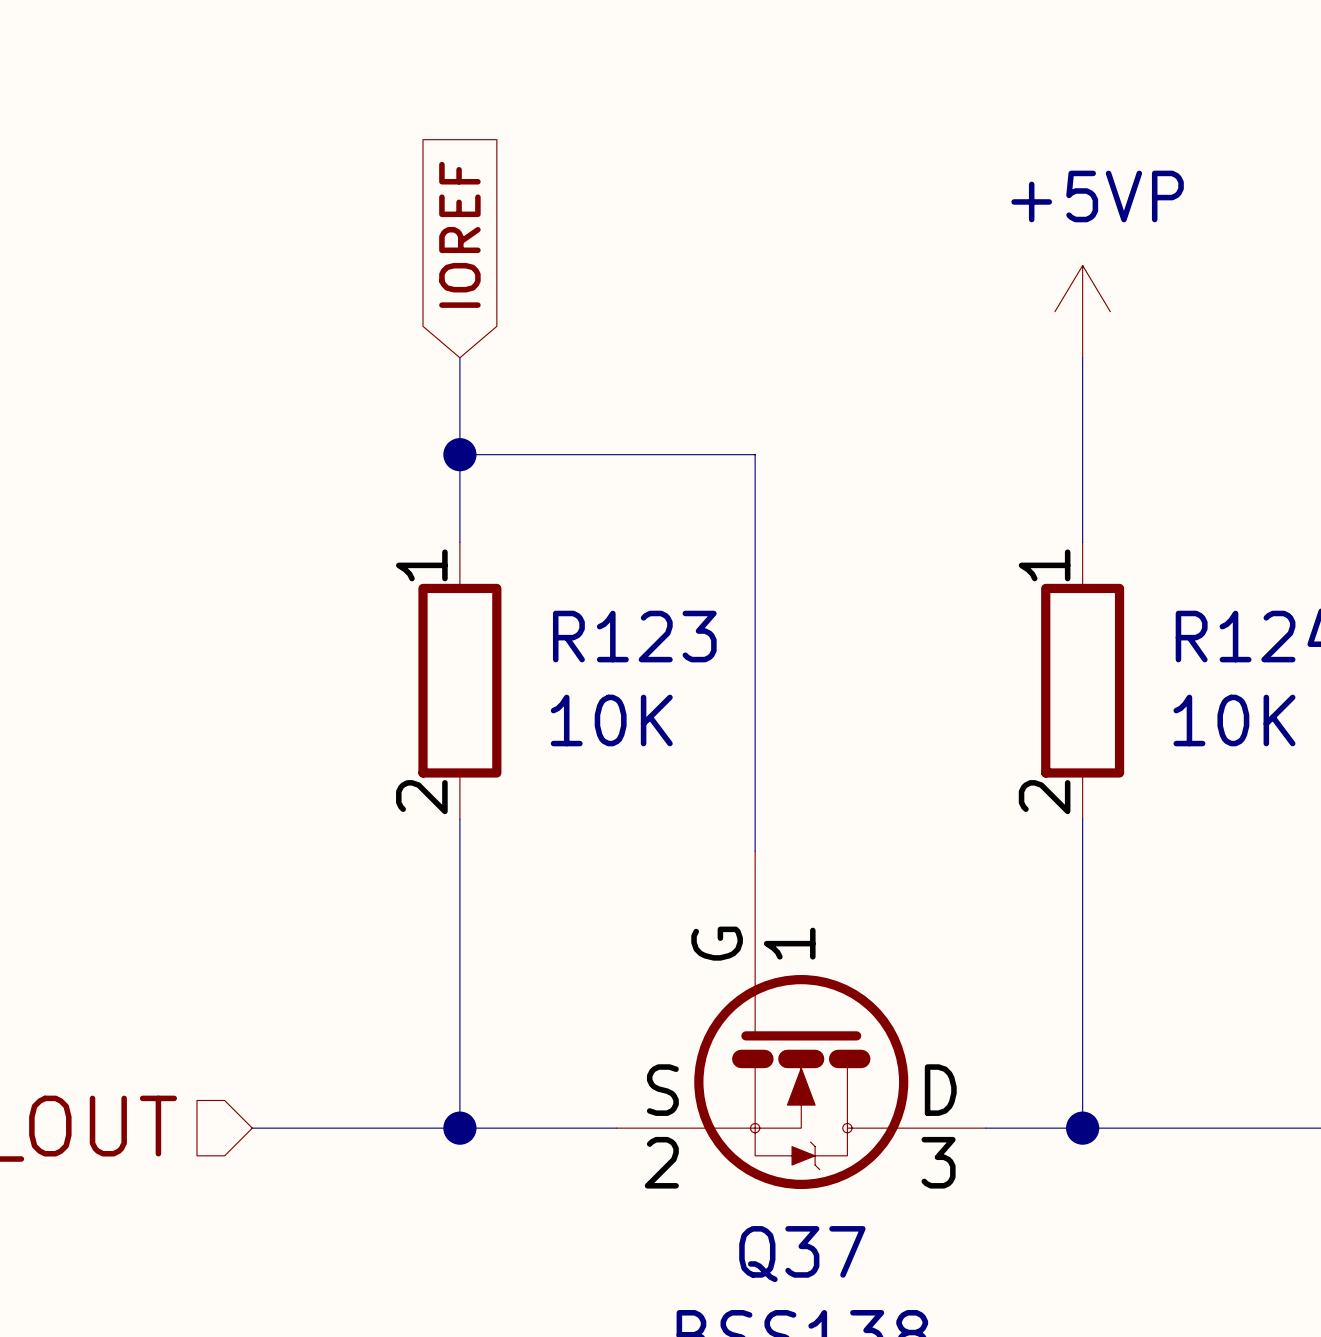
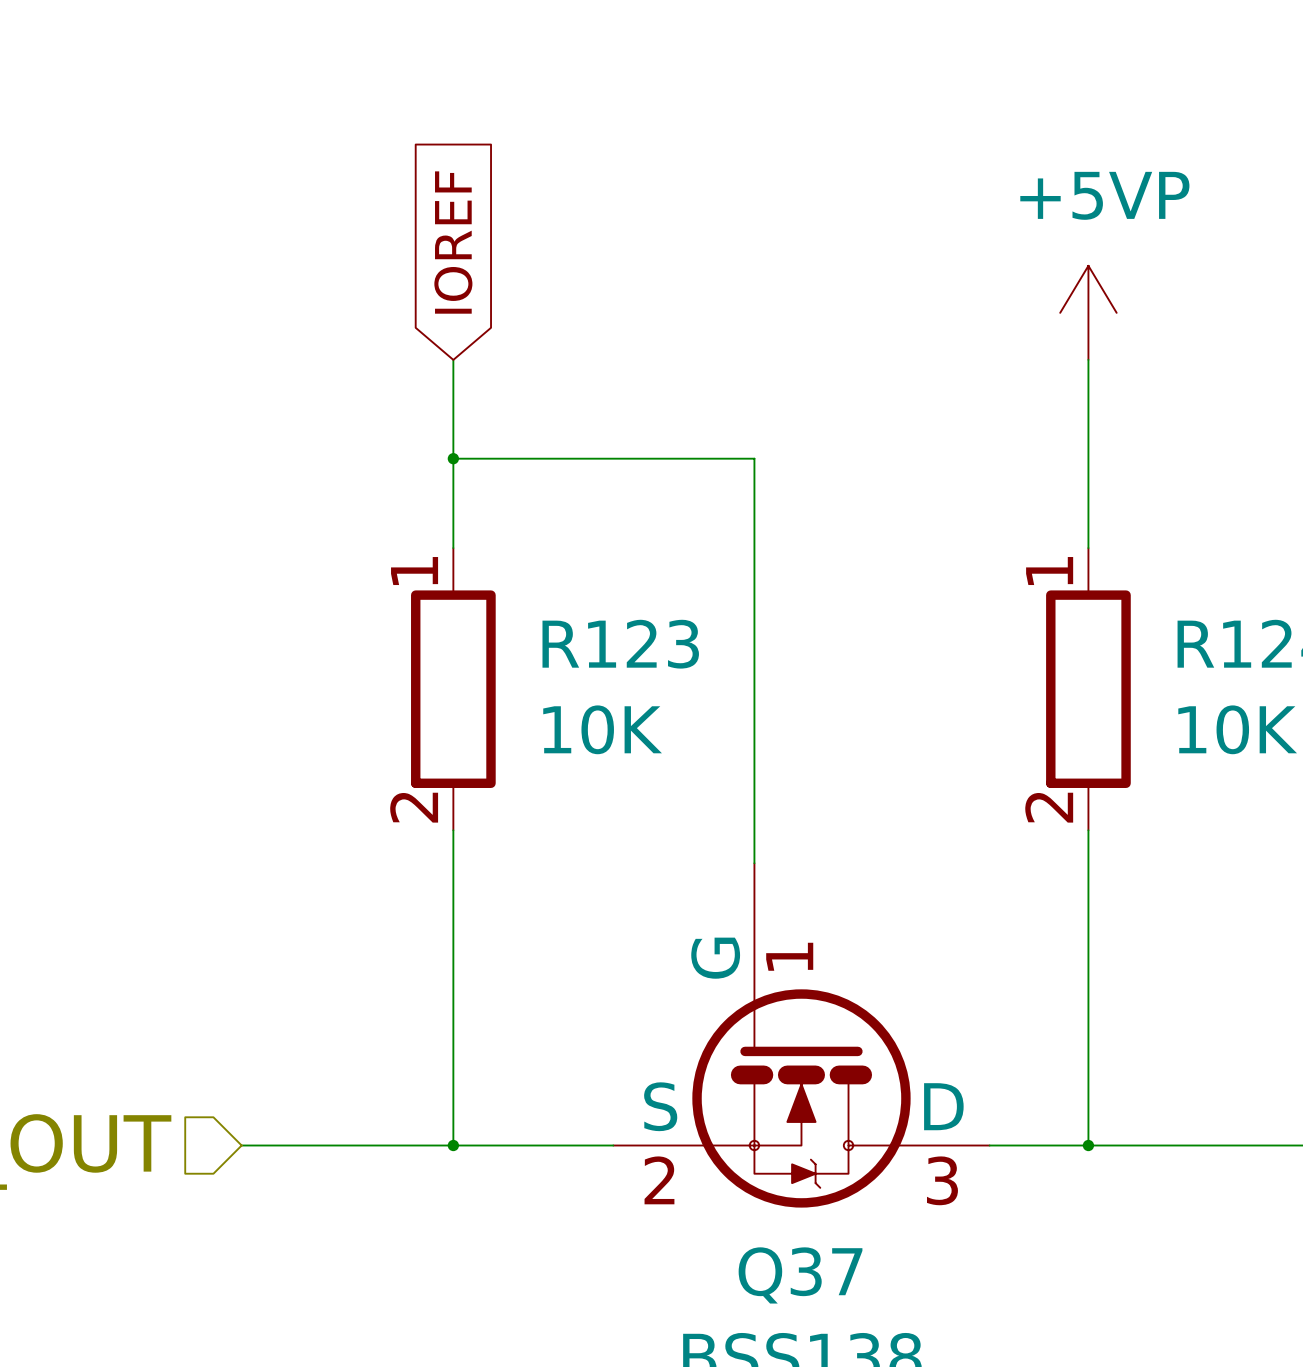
junction size: [443, 438, 477, 472] -> [447, 453, 460, 465]
junction size: [443, 1111, 477, 1145] -> [447, 1139, 460, 1152]
junction size: [1066, 1111, 1100, 1145] -> [1082, 1139, 1095, 1152]

